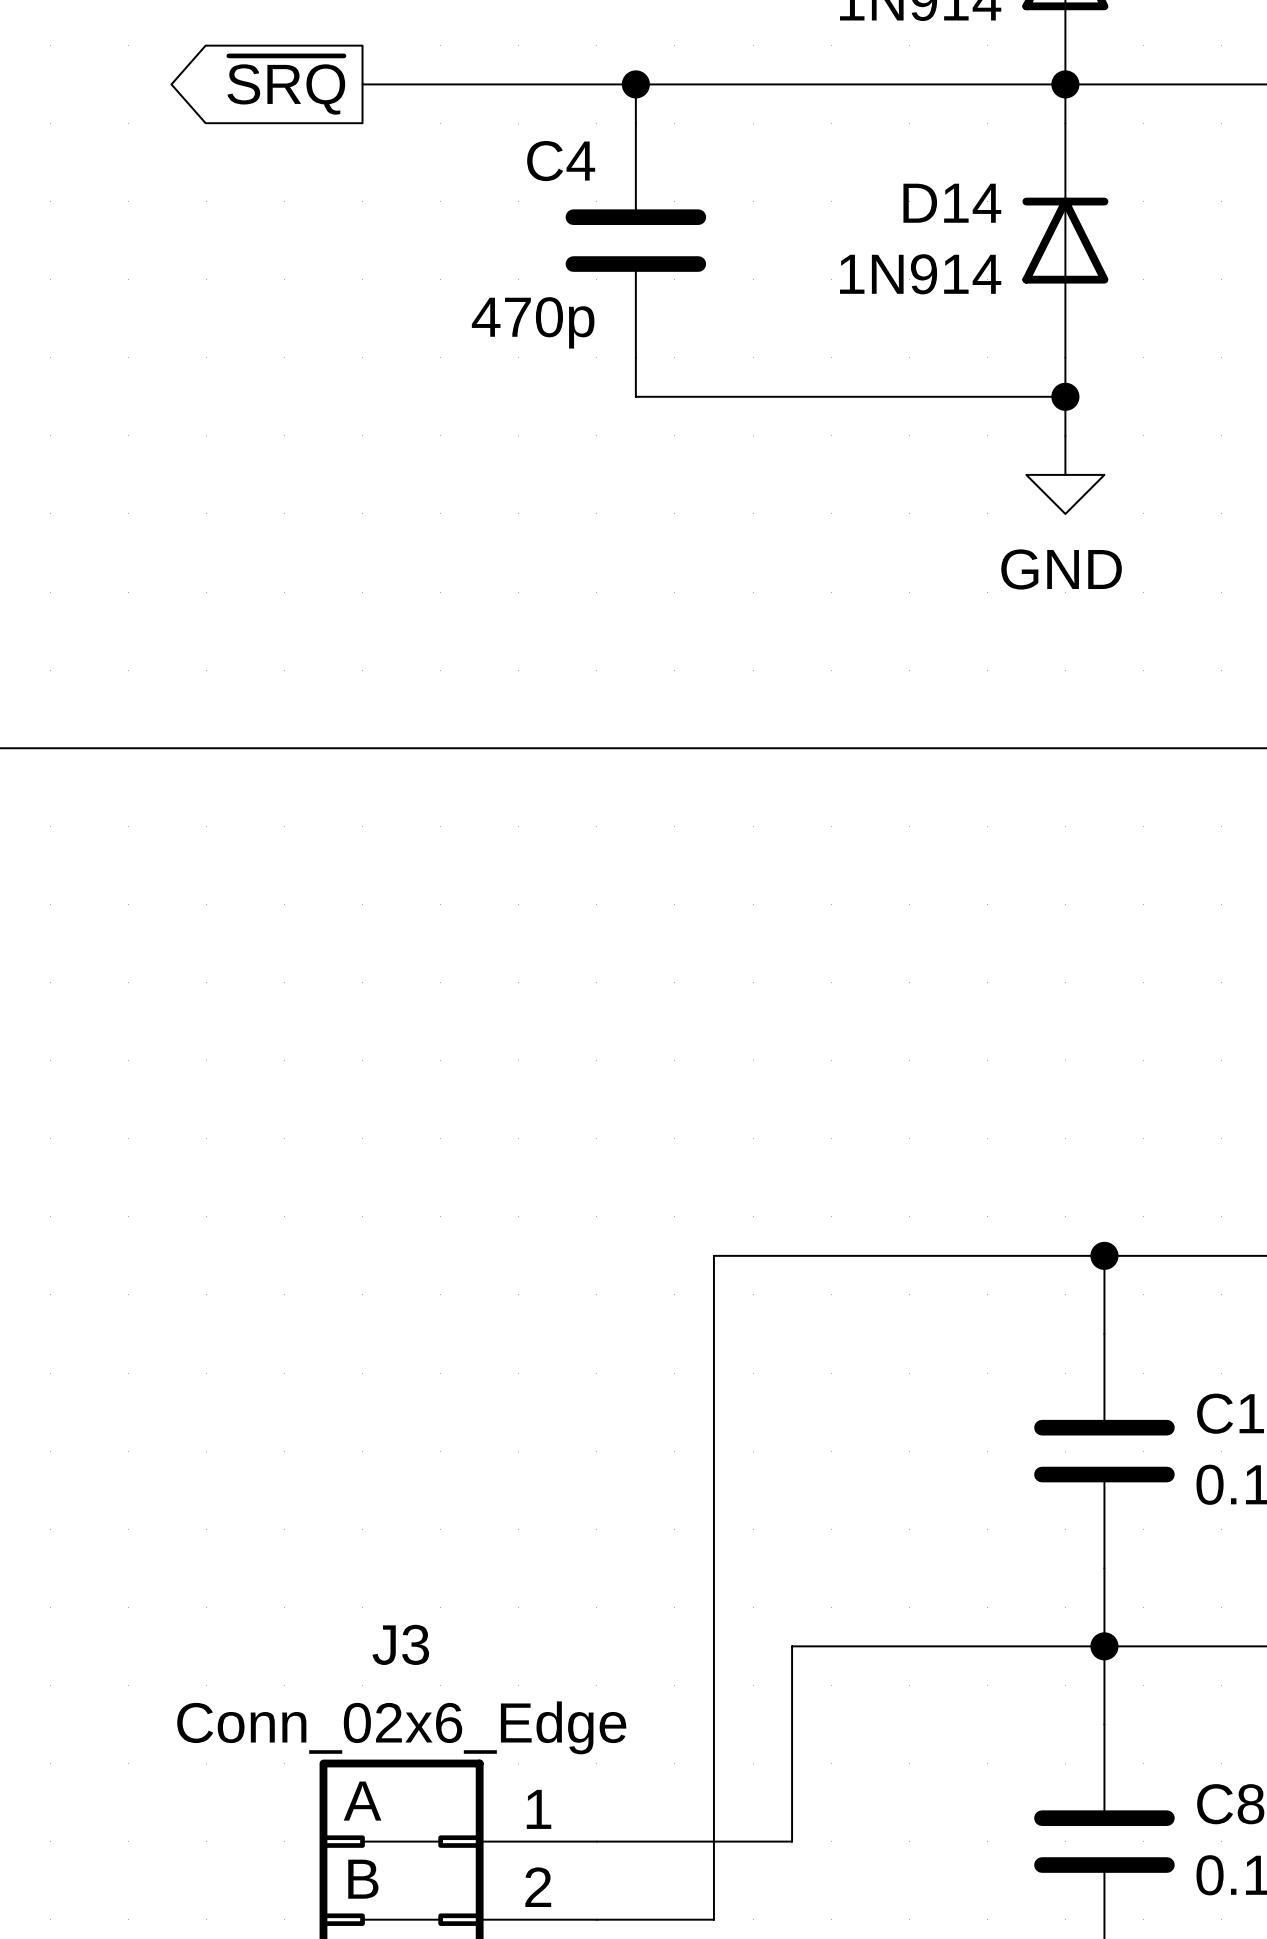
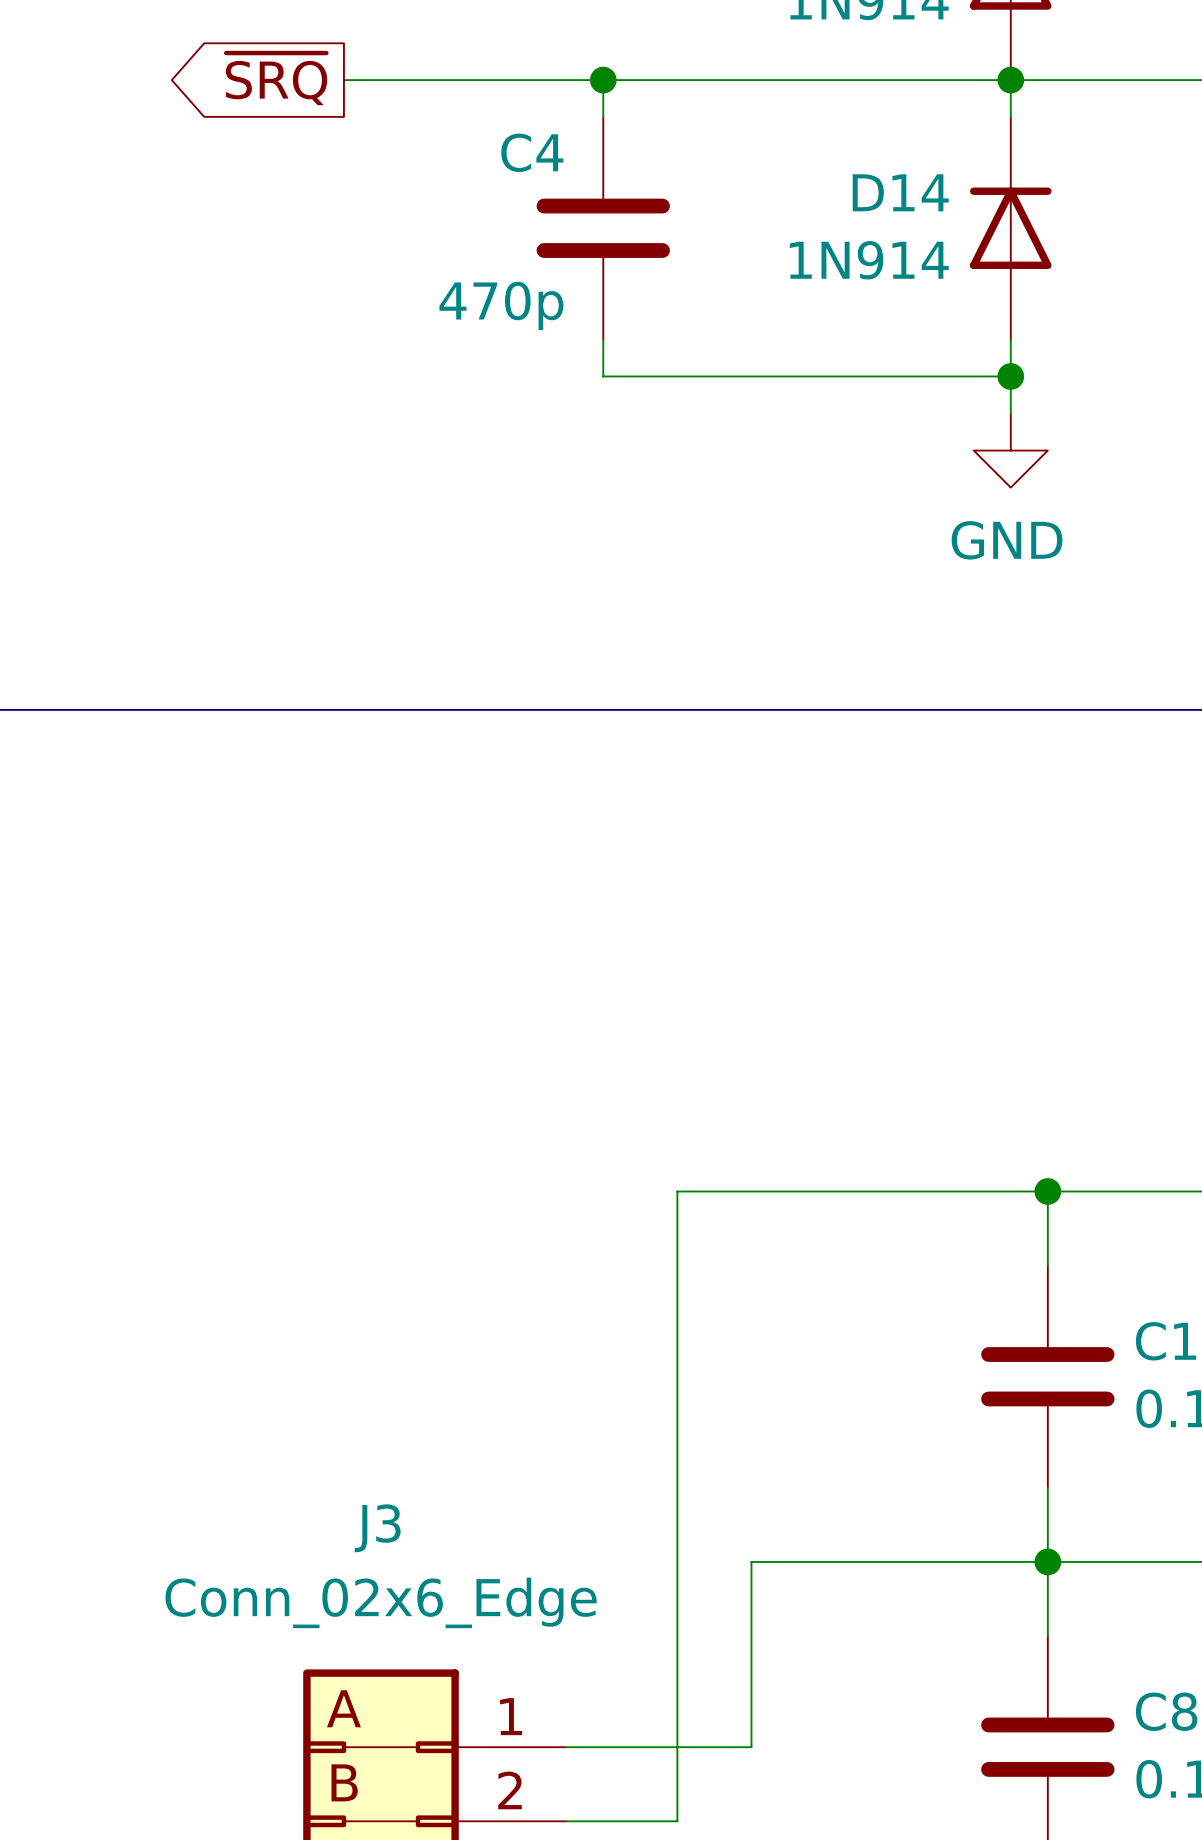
J3 name position: J3 (400, 1644) -> J3 (377, 1528)
J3 value position: Conn_02x6_Edge (401, 1727) -> Conn_02x6_Edge (381, 1602)

